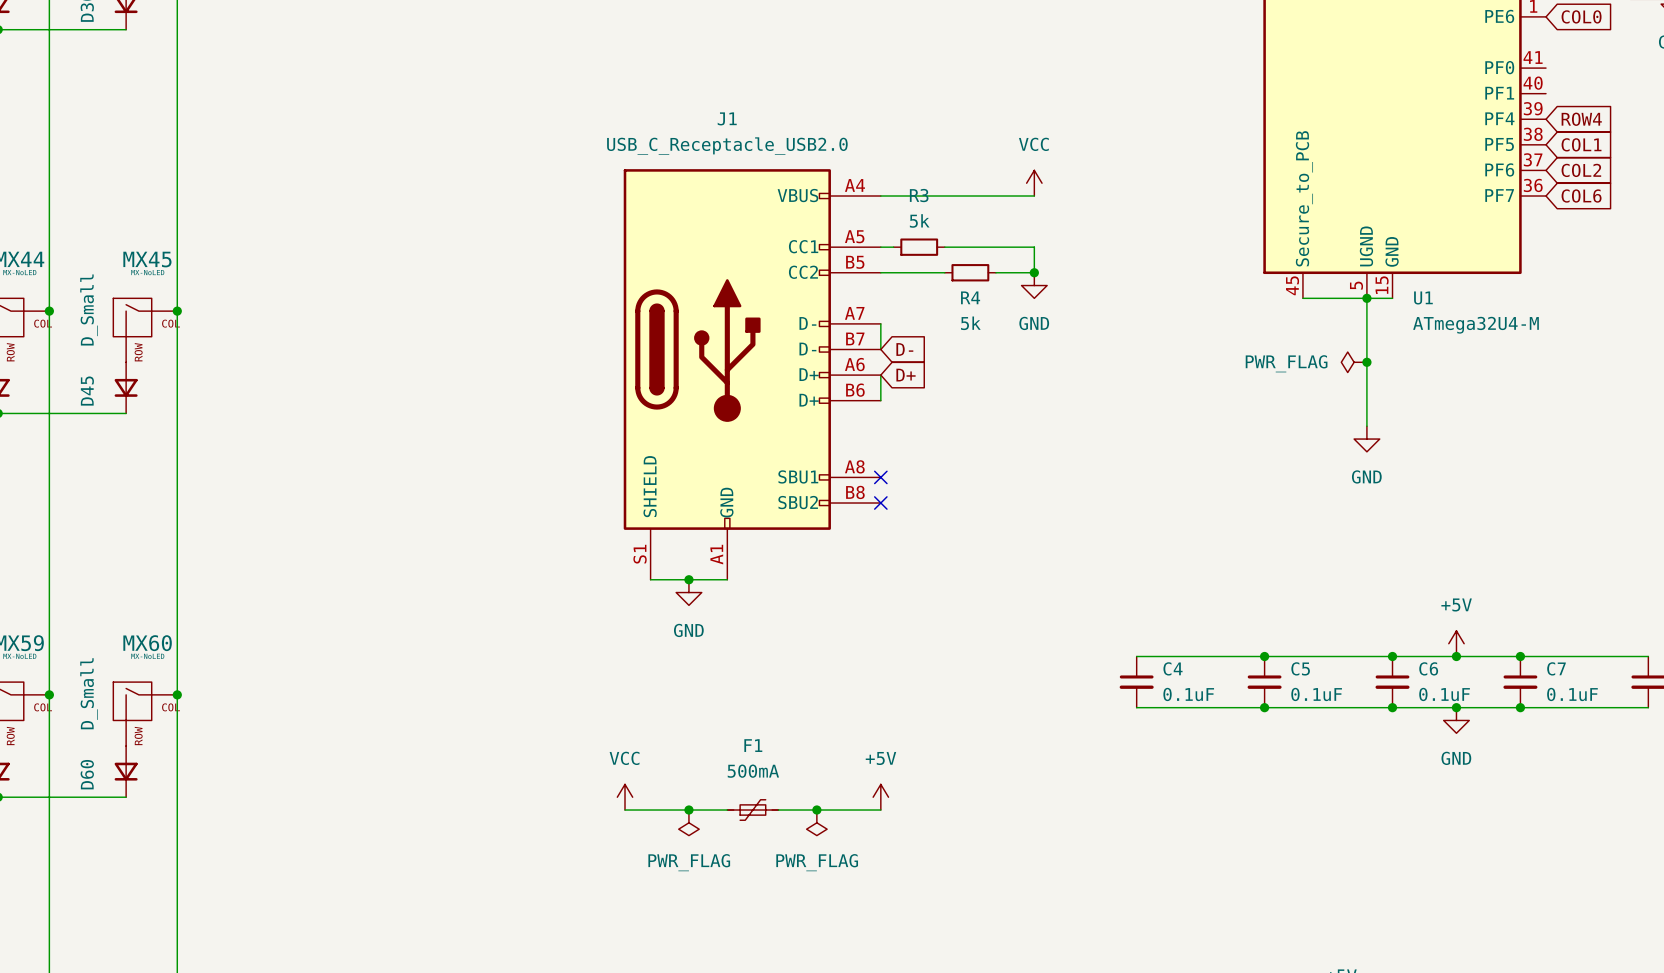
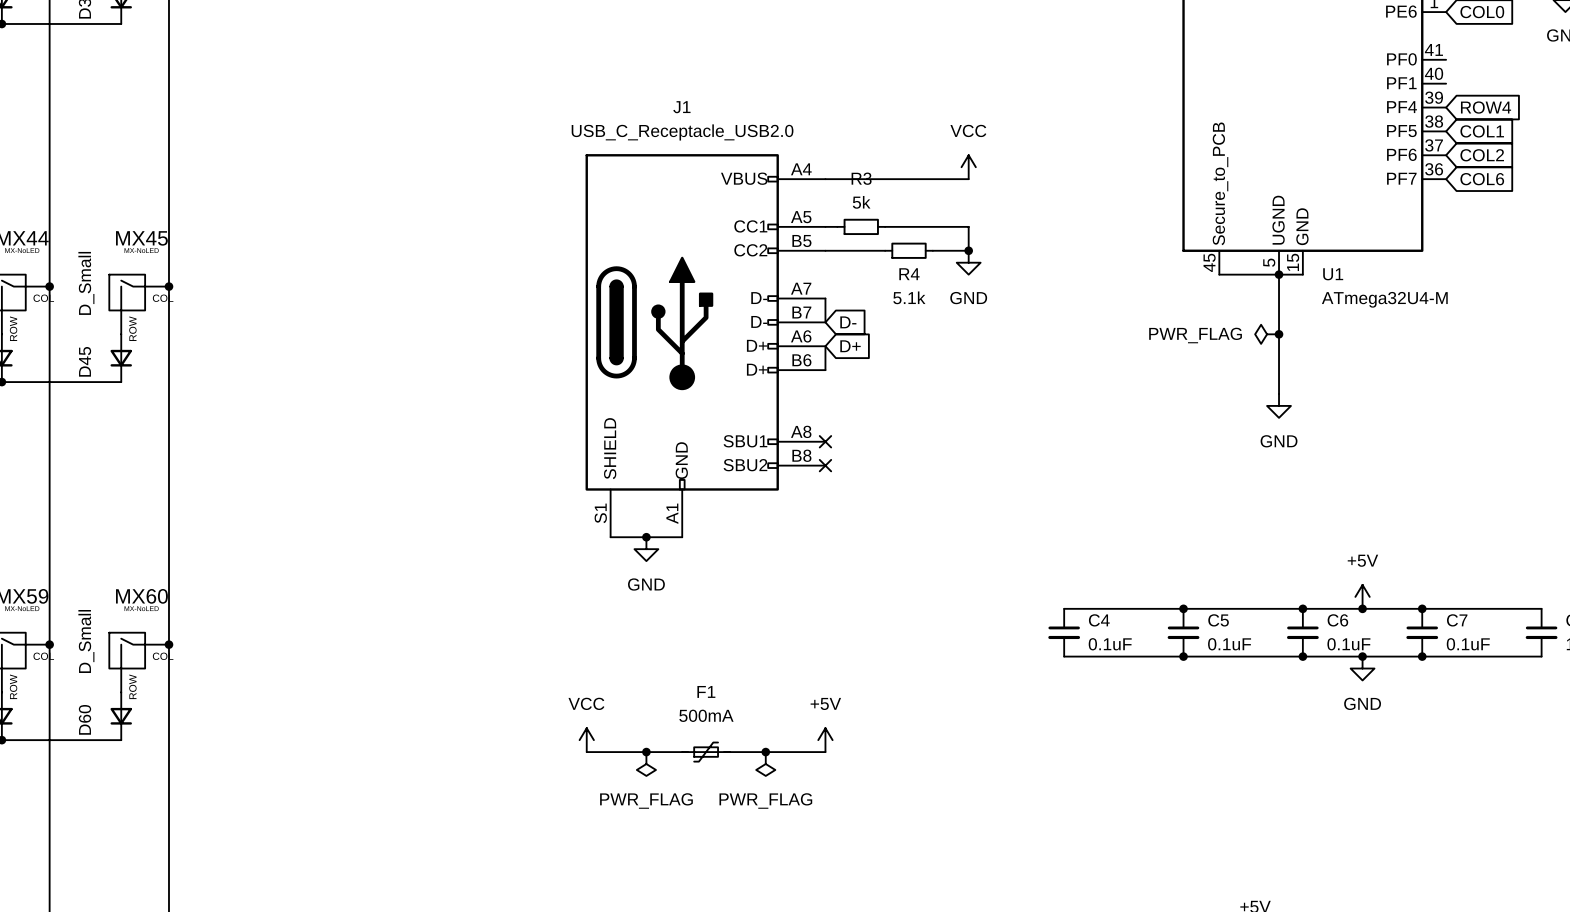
R4 value: 5k (970, 323) -> 5.1k (909, 297)

